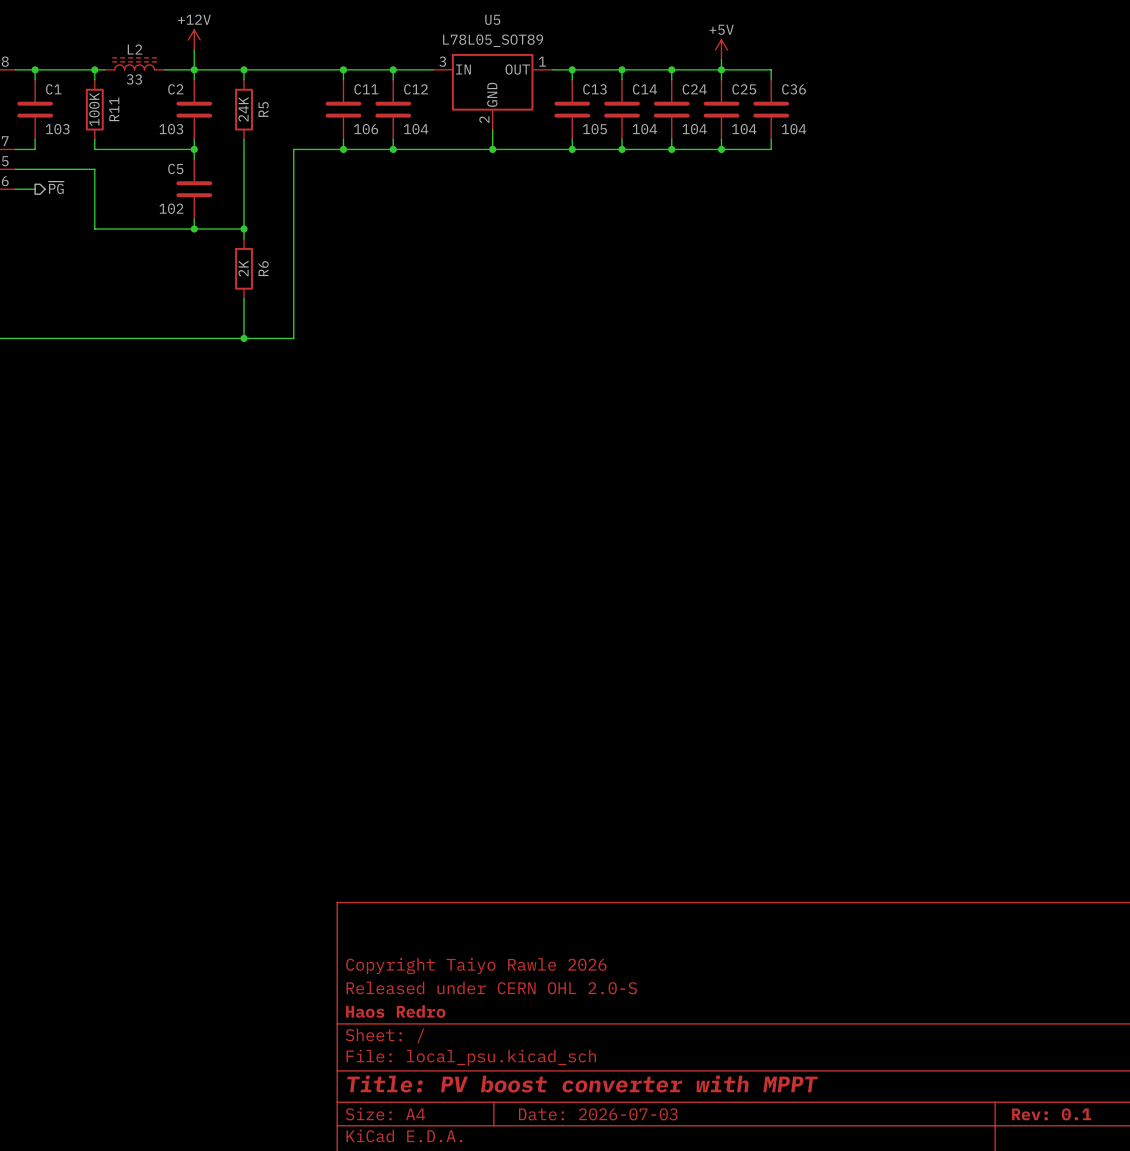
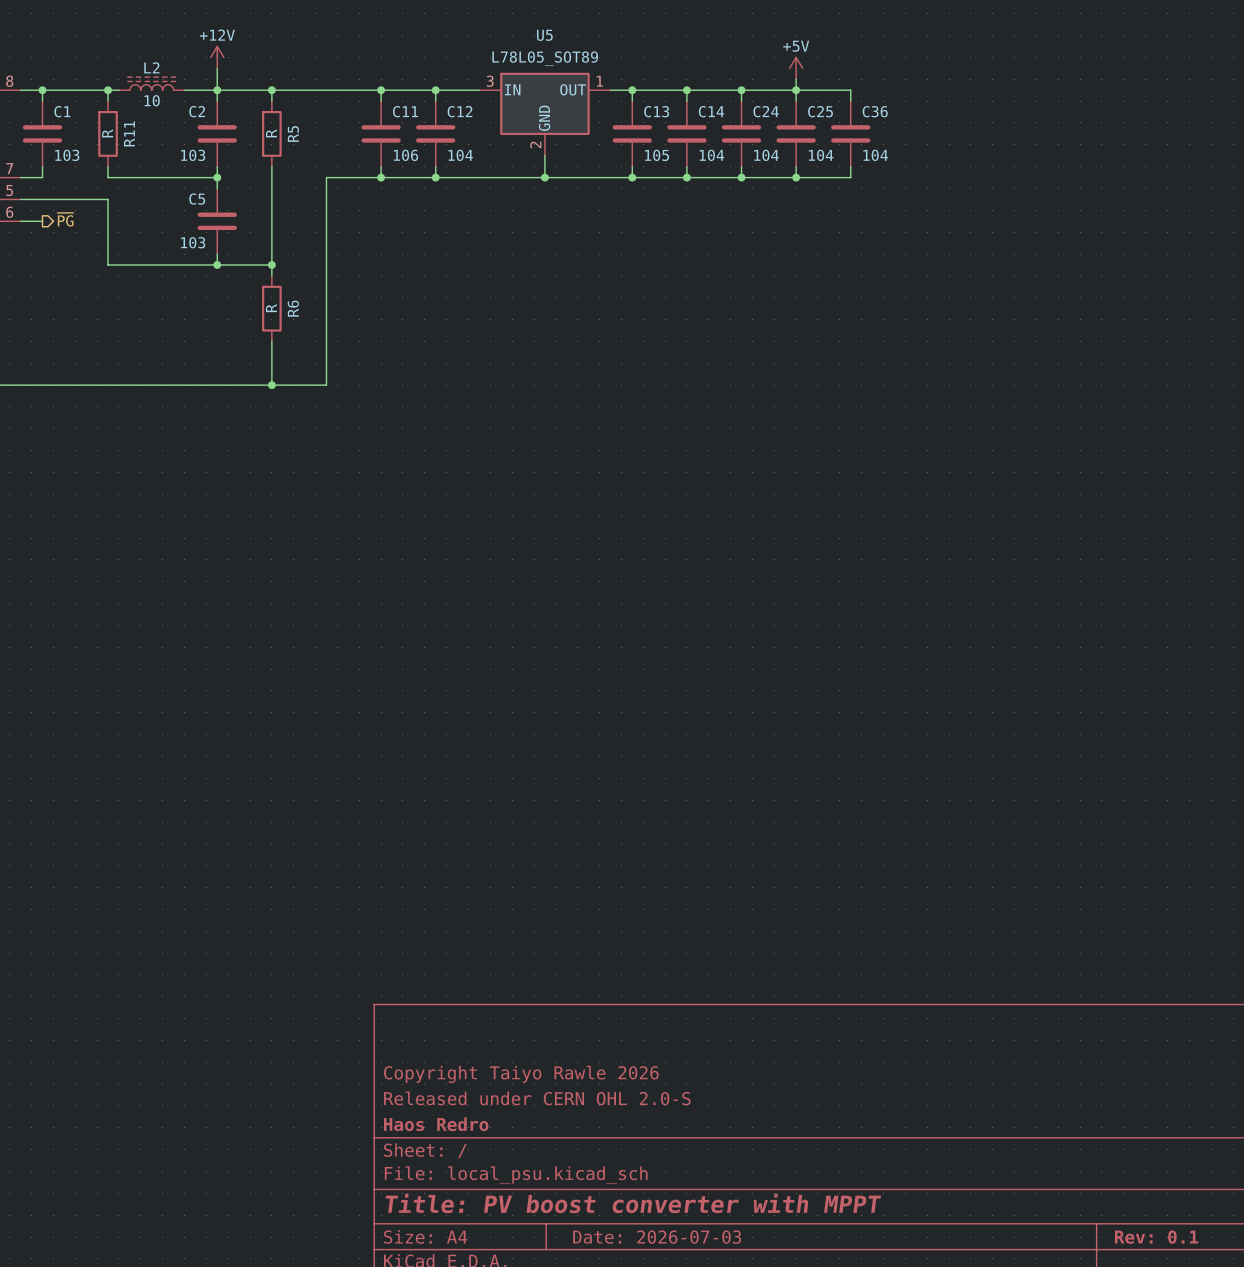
L2 value: 33 (134, 79) -> 10 (152, 100)
R11 value: 100K (94, 109) -> R (107, 133)
R5 value: 24K (243, 109) -> R (271, 133)
C5 value: 102 (171, 208) -> 103 (193, 242)
R6 value: 2K (243, 268) -> R (271, 308)

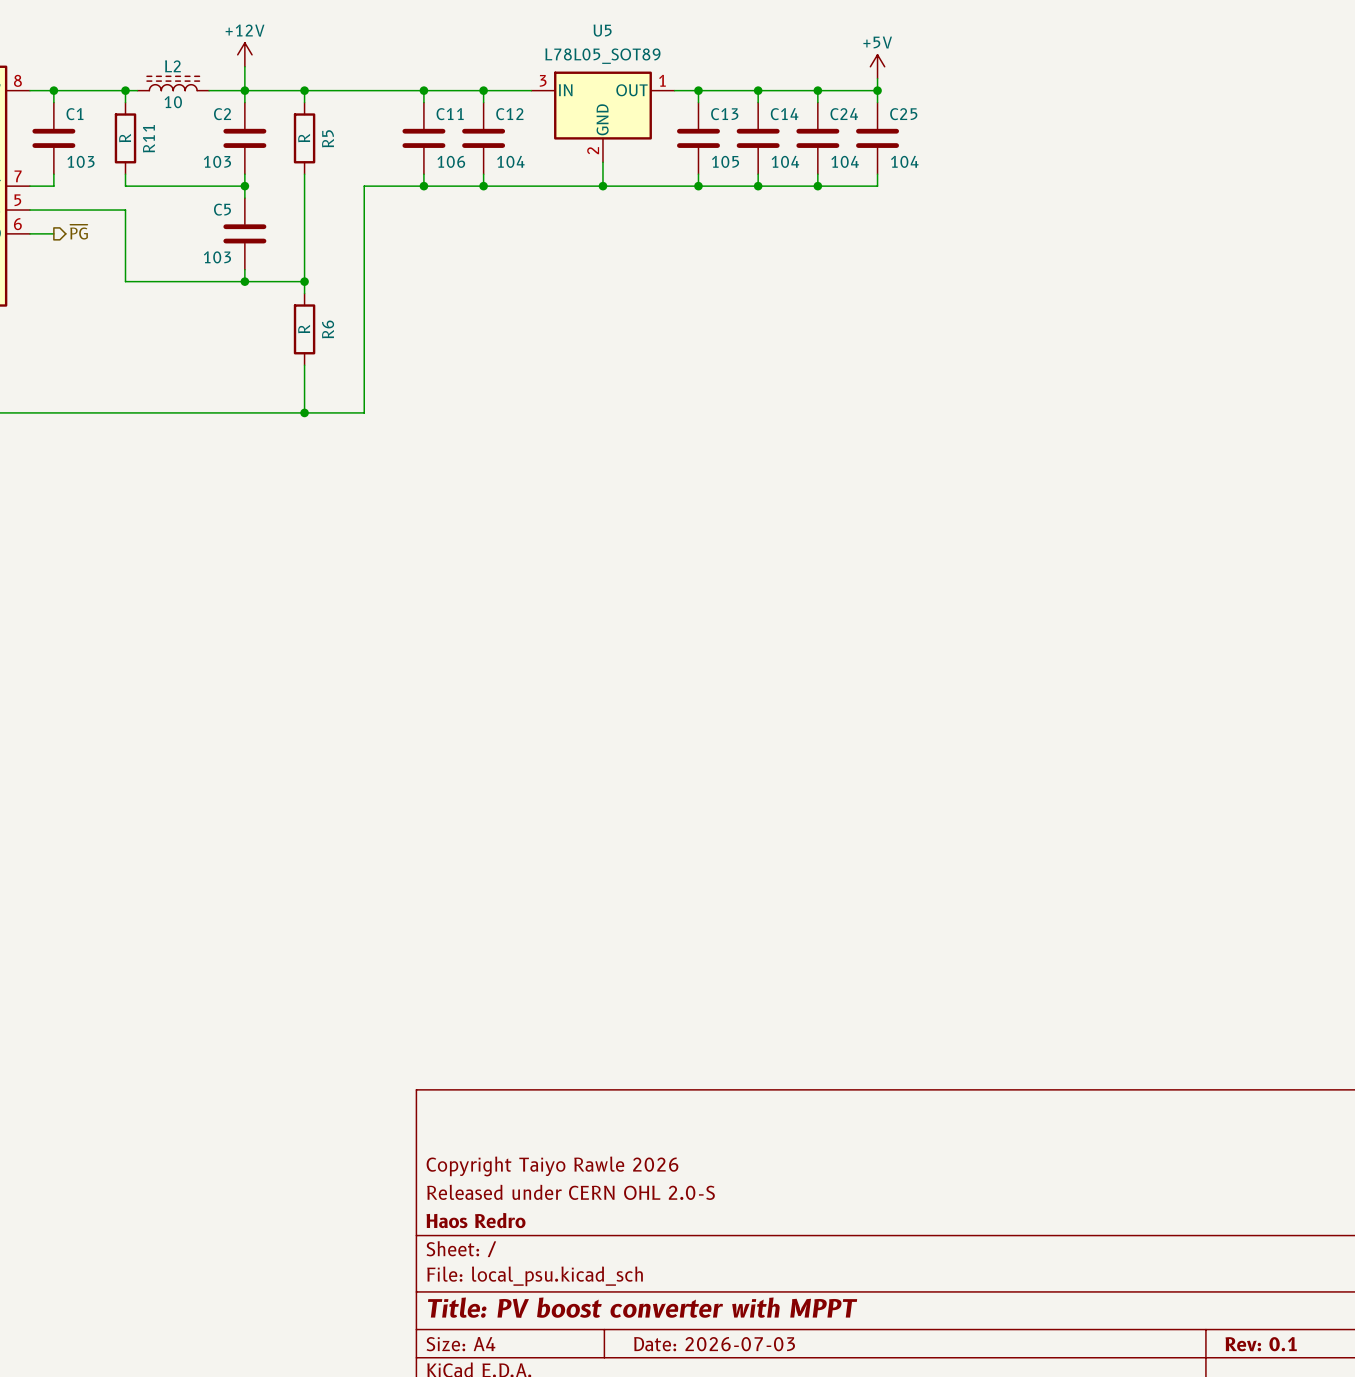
wire: (796, 90) (850, 90) (850, 101) -> none
C36: 104 (850, 133) -> none
wire: (850, 166) (850, 177) (796, 177) -> none
junction: (796, 177) -> none

